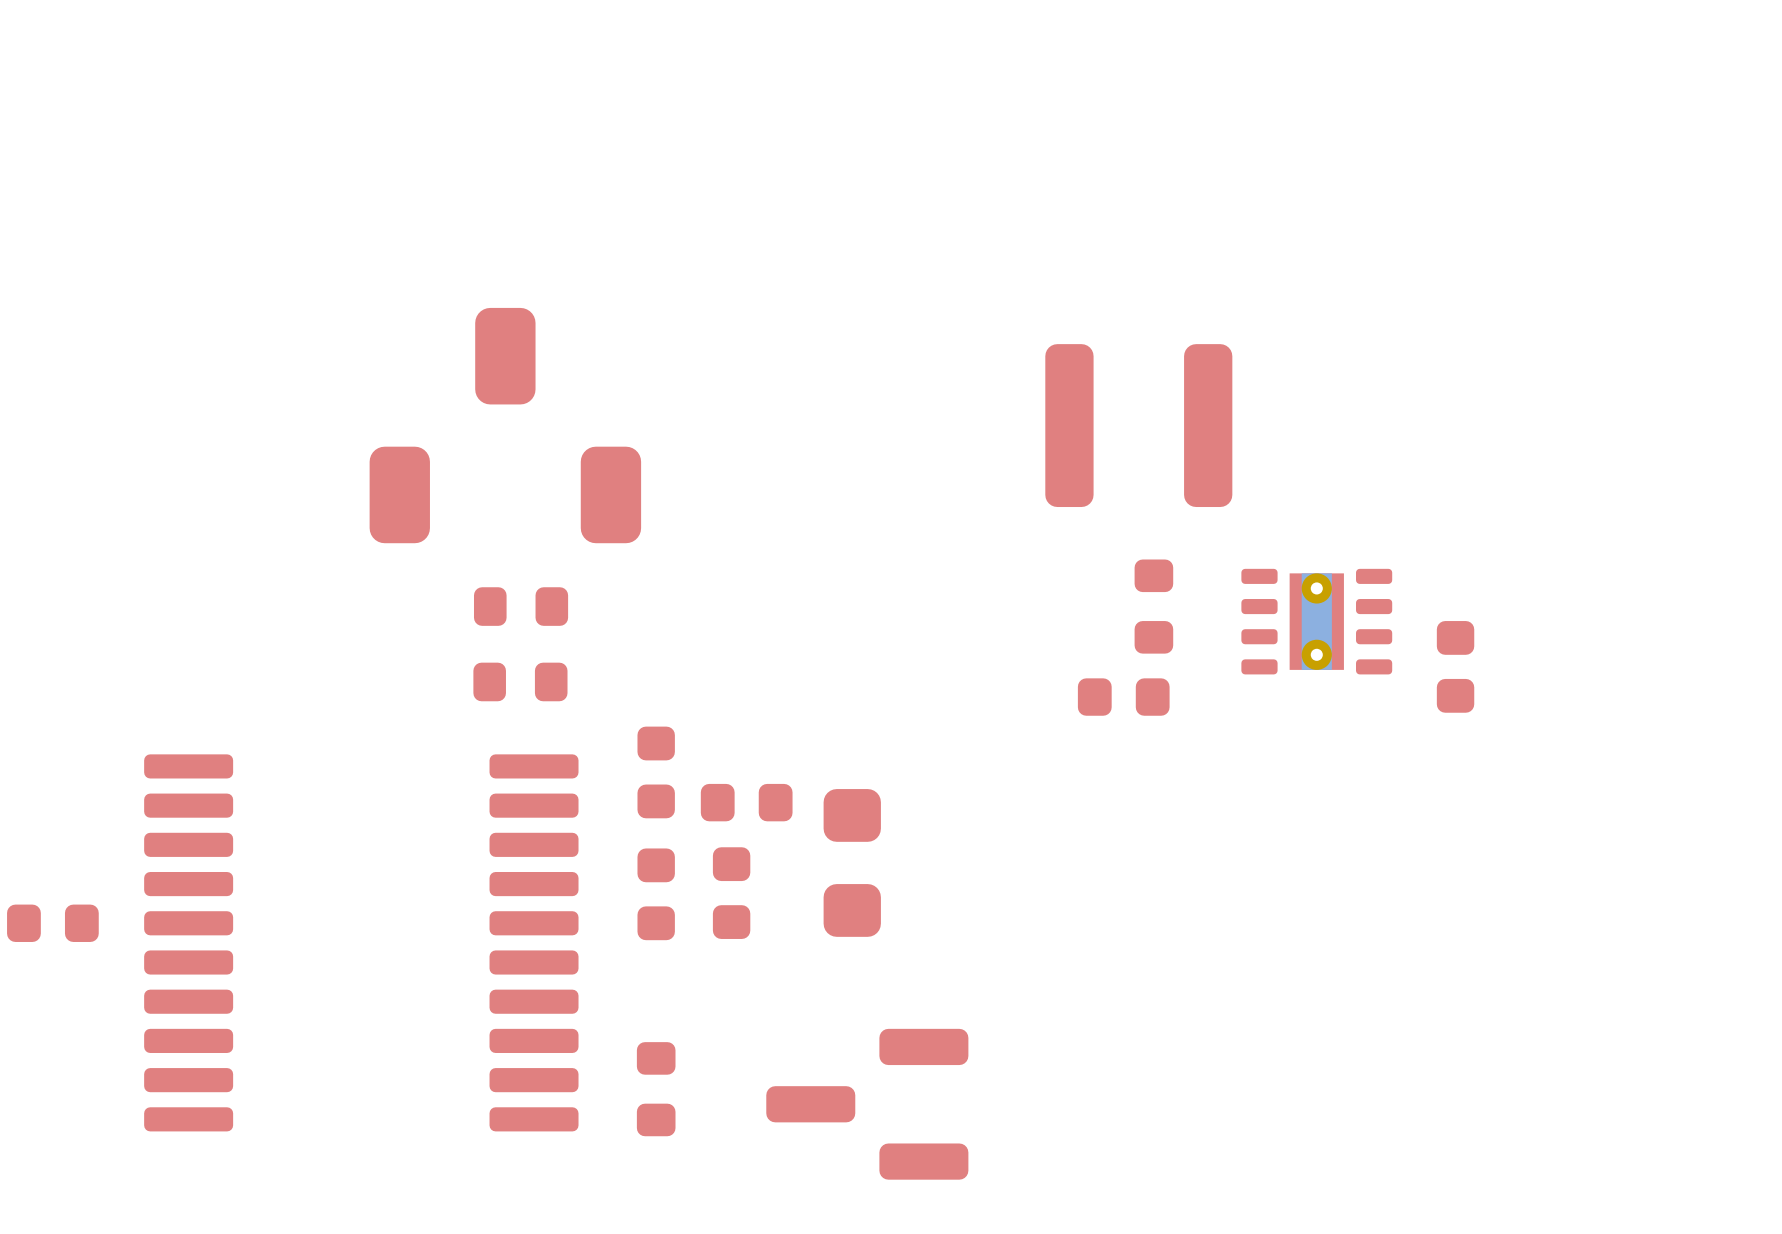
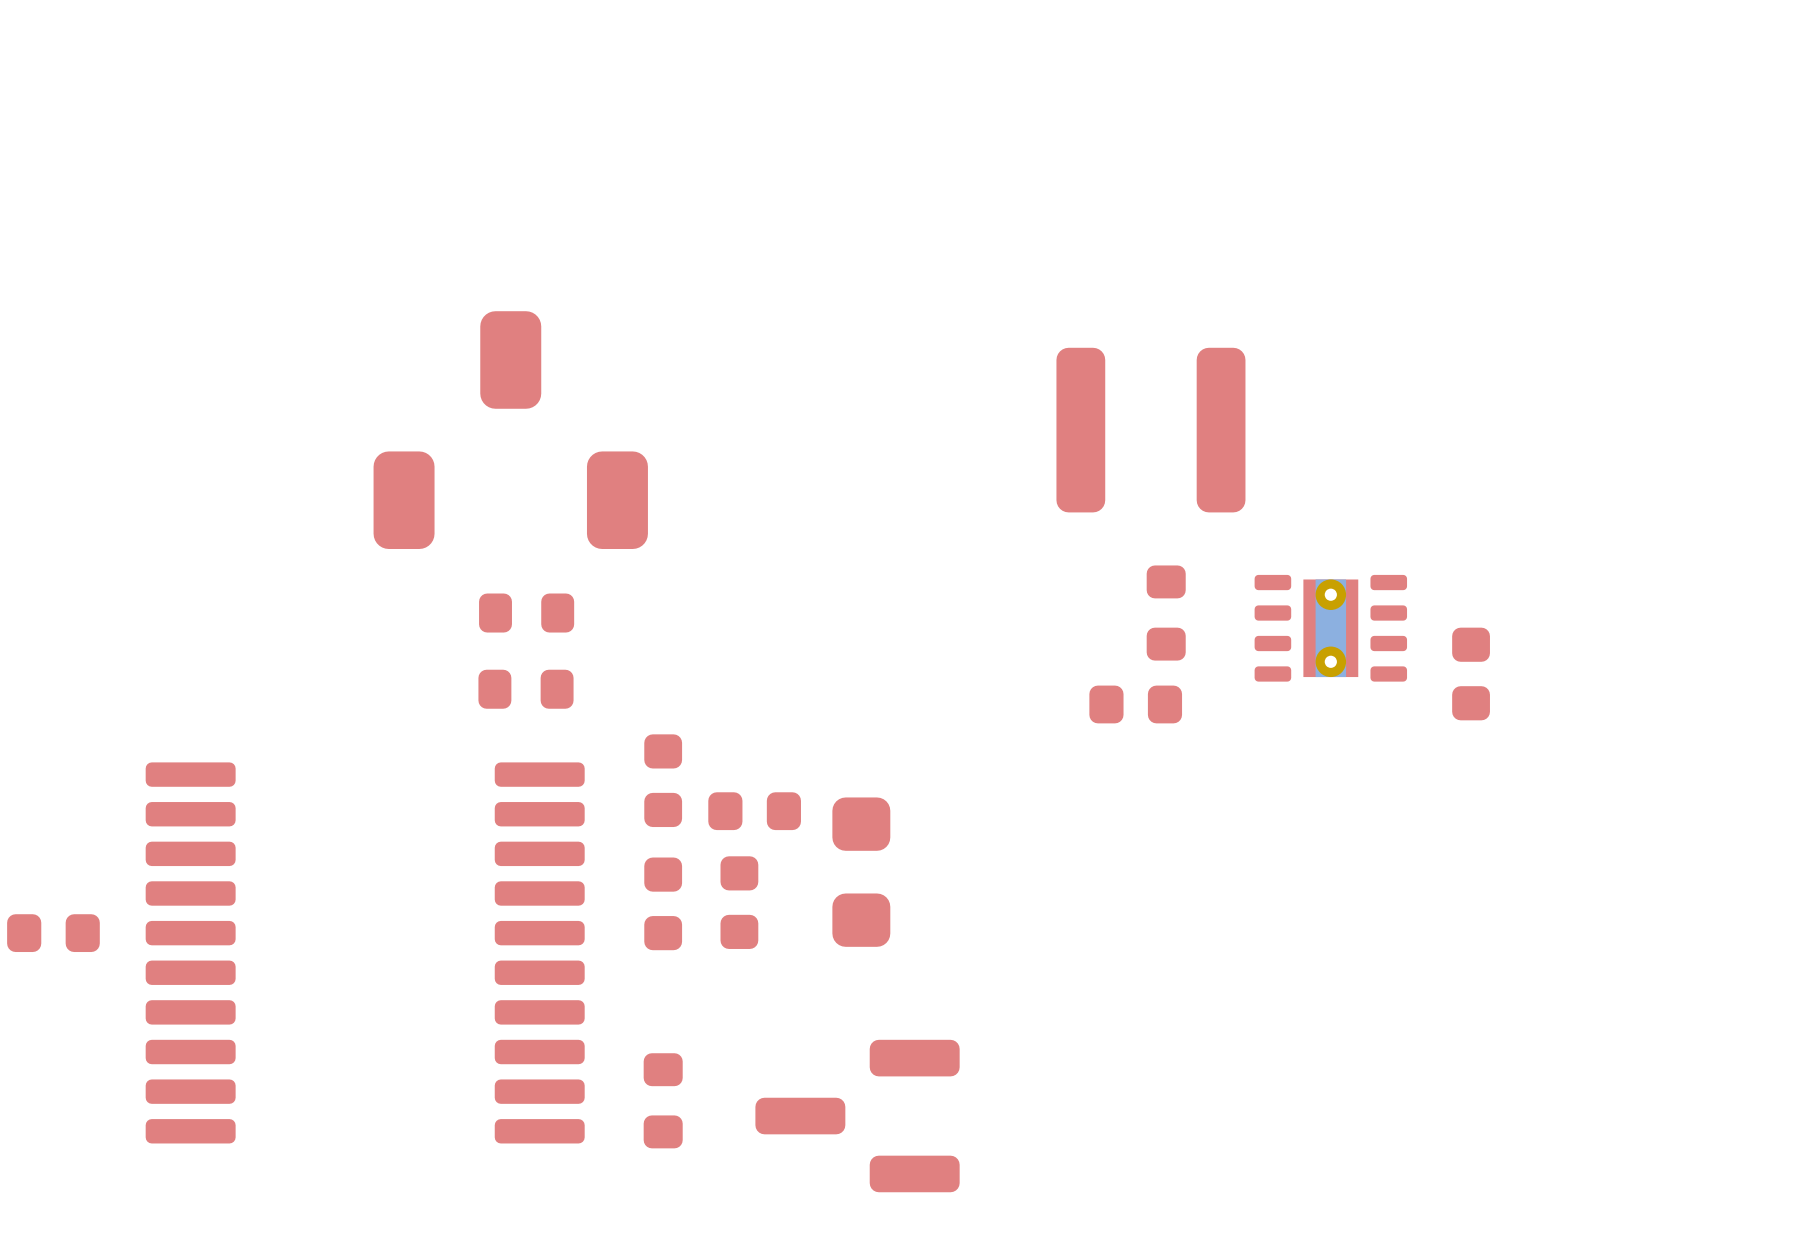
part position: (867, 1104) -> (857, 1116)

